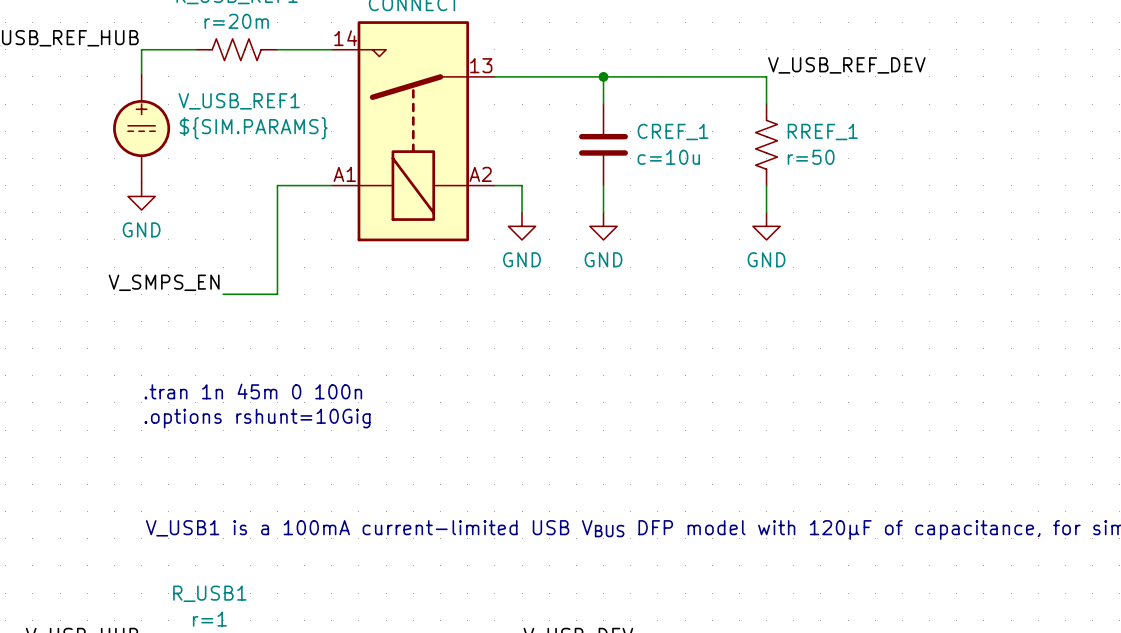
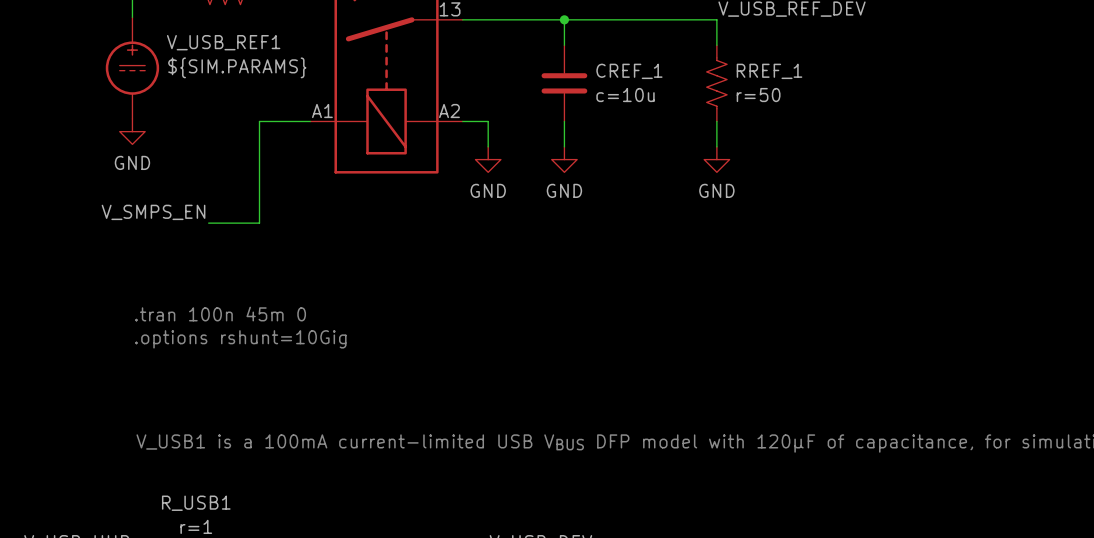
text: .tran 1n 45m 0 100n (253, 391) -> .tran 100n 45m 0 (220, 314)

